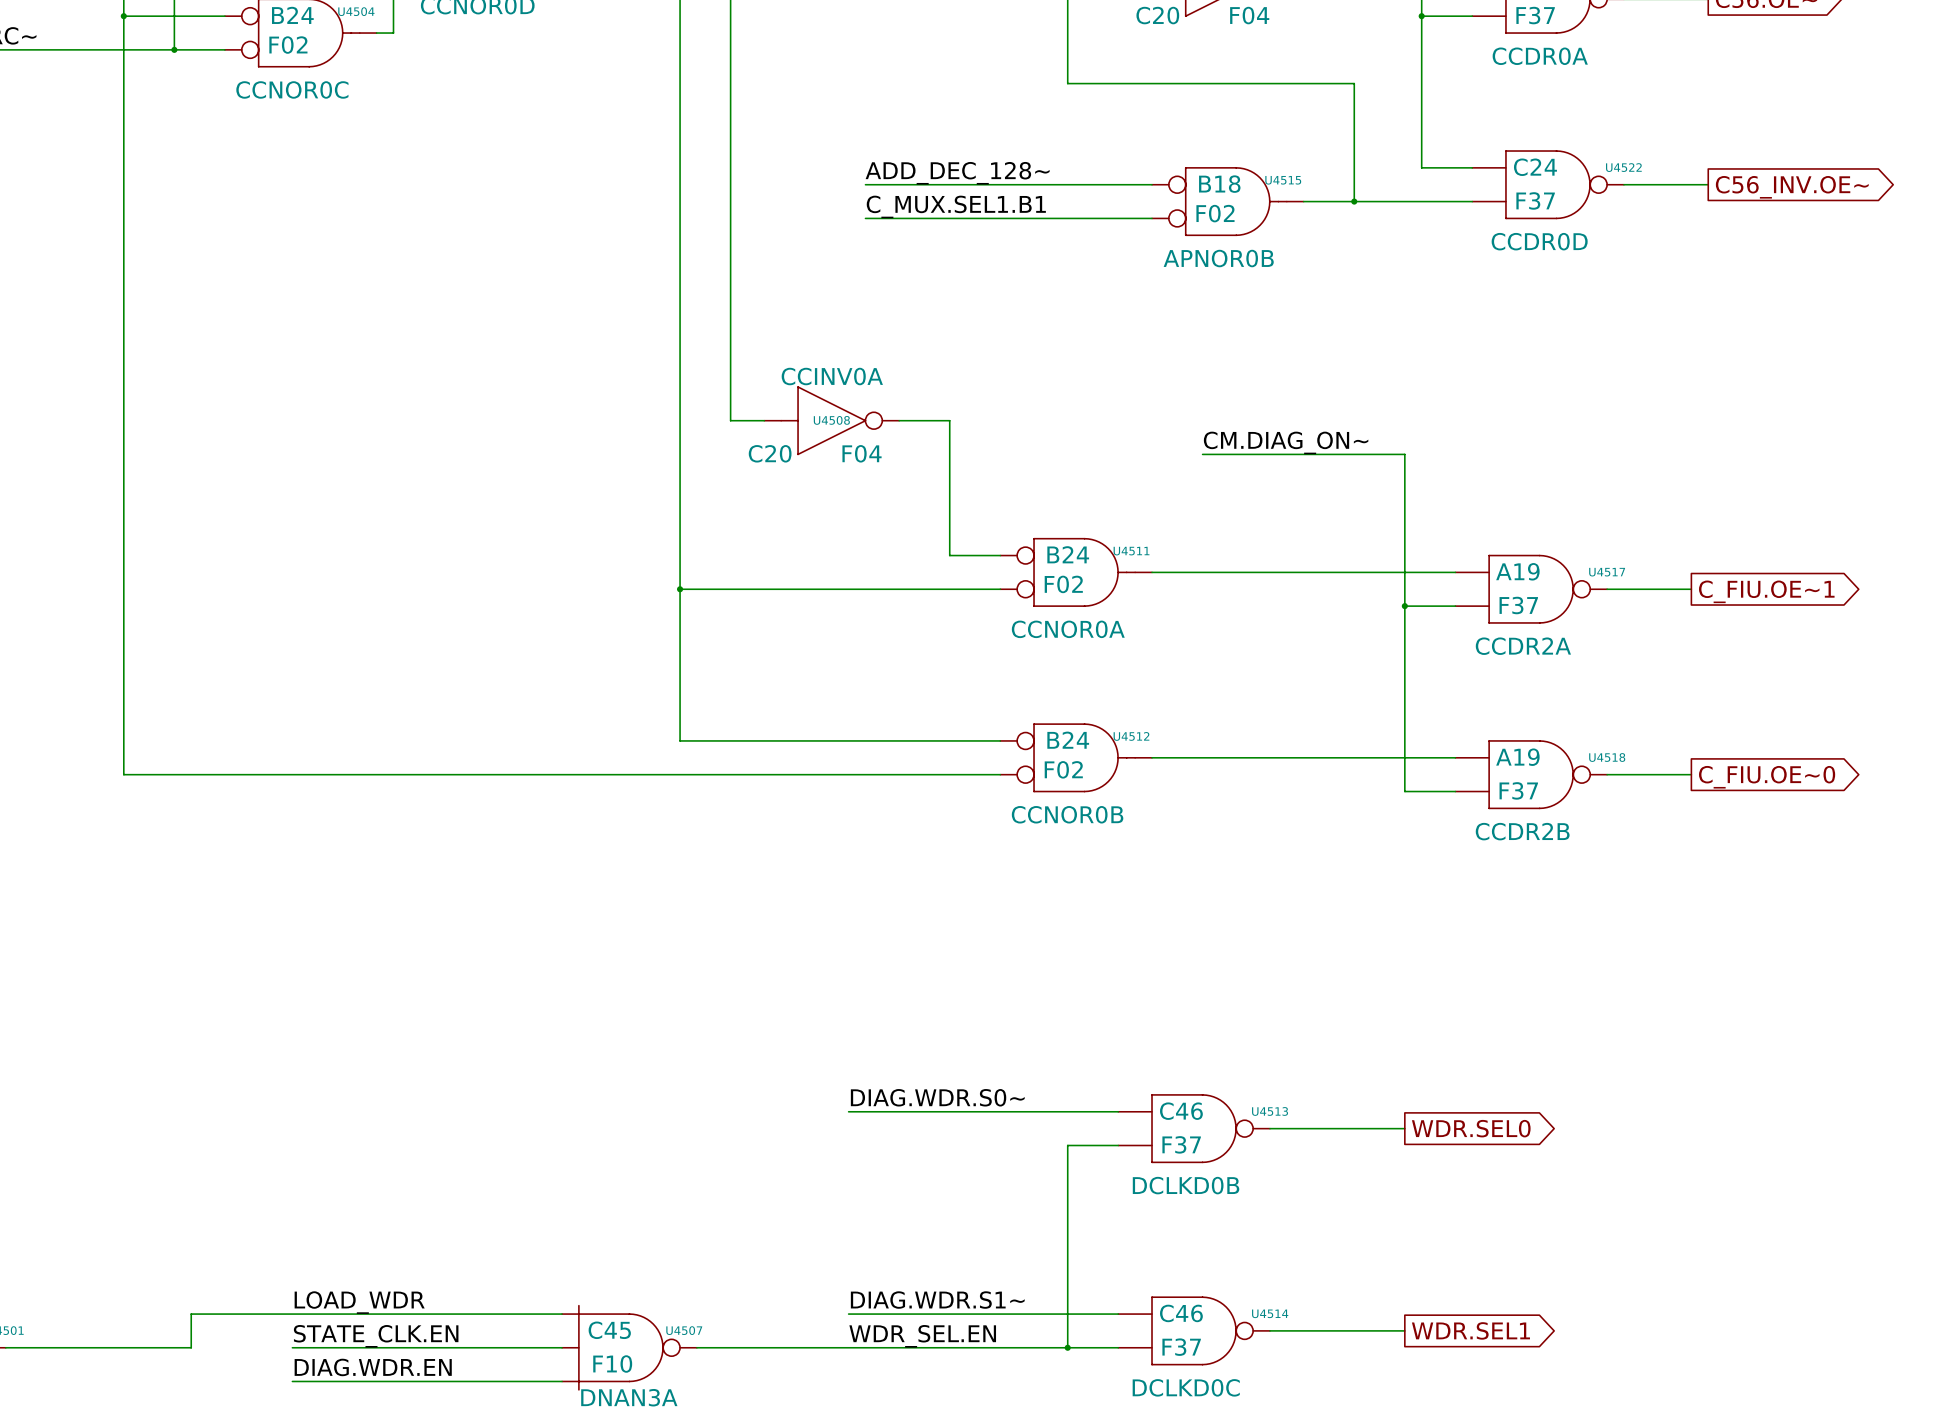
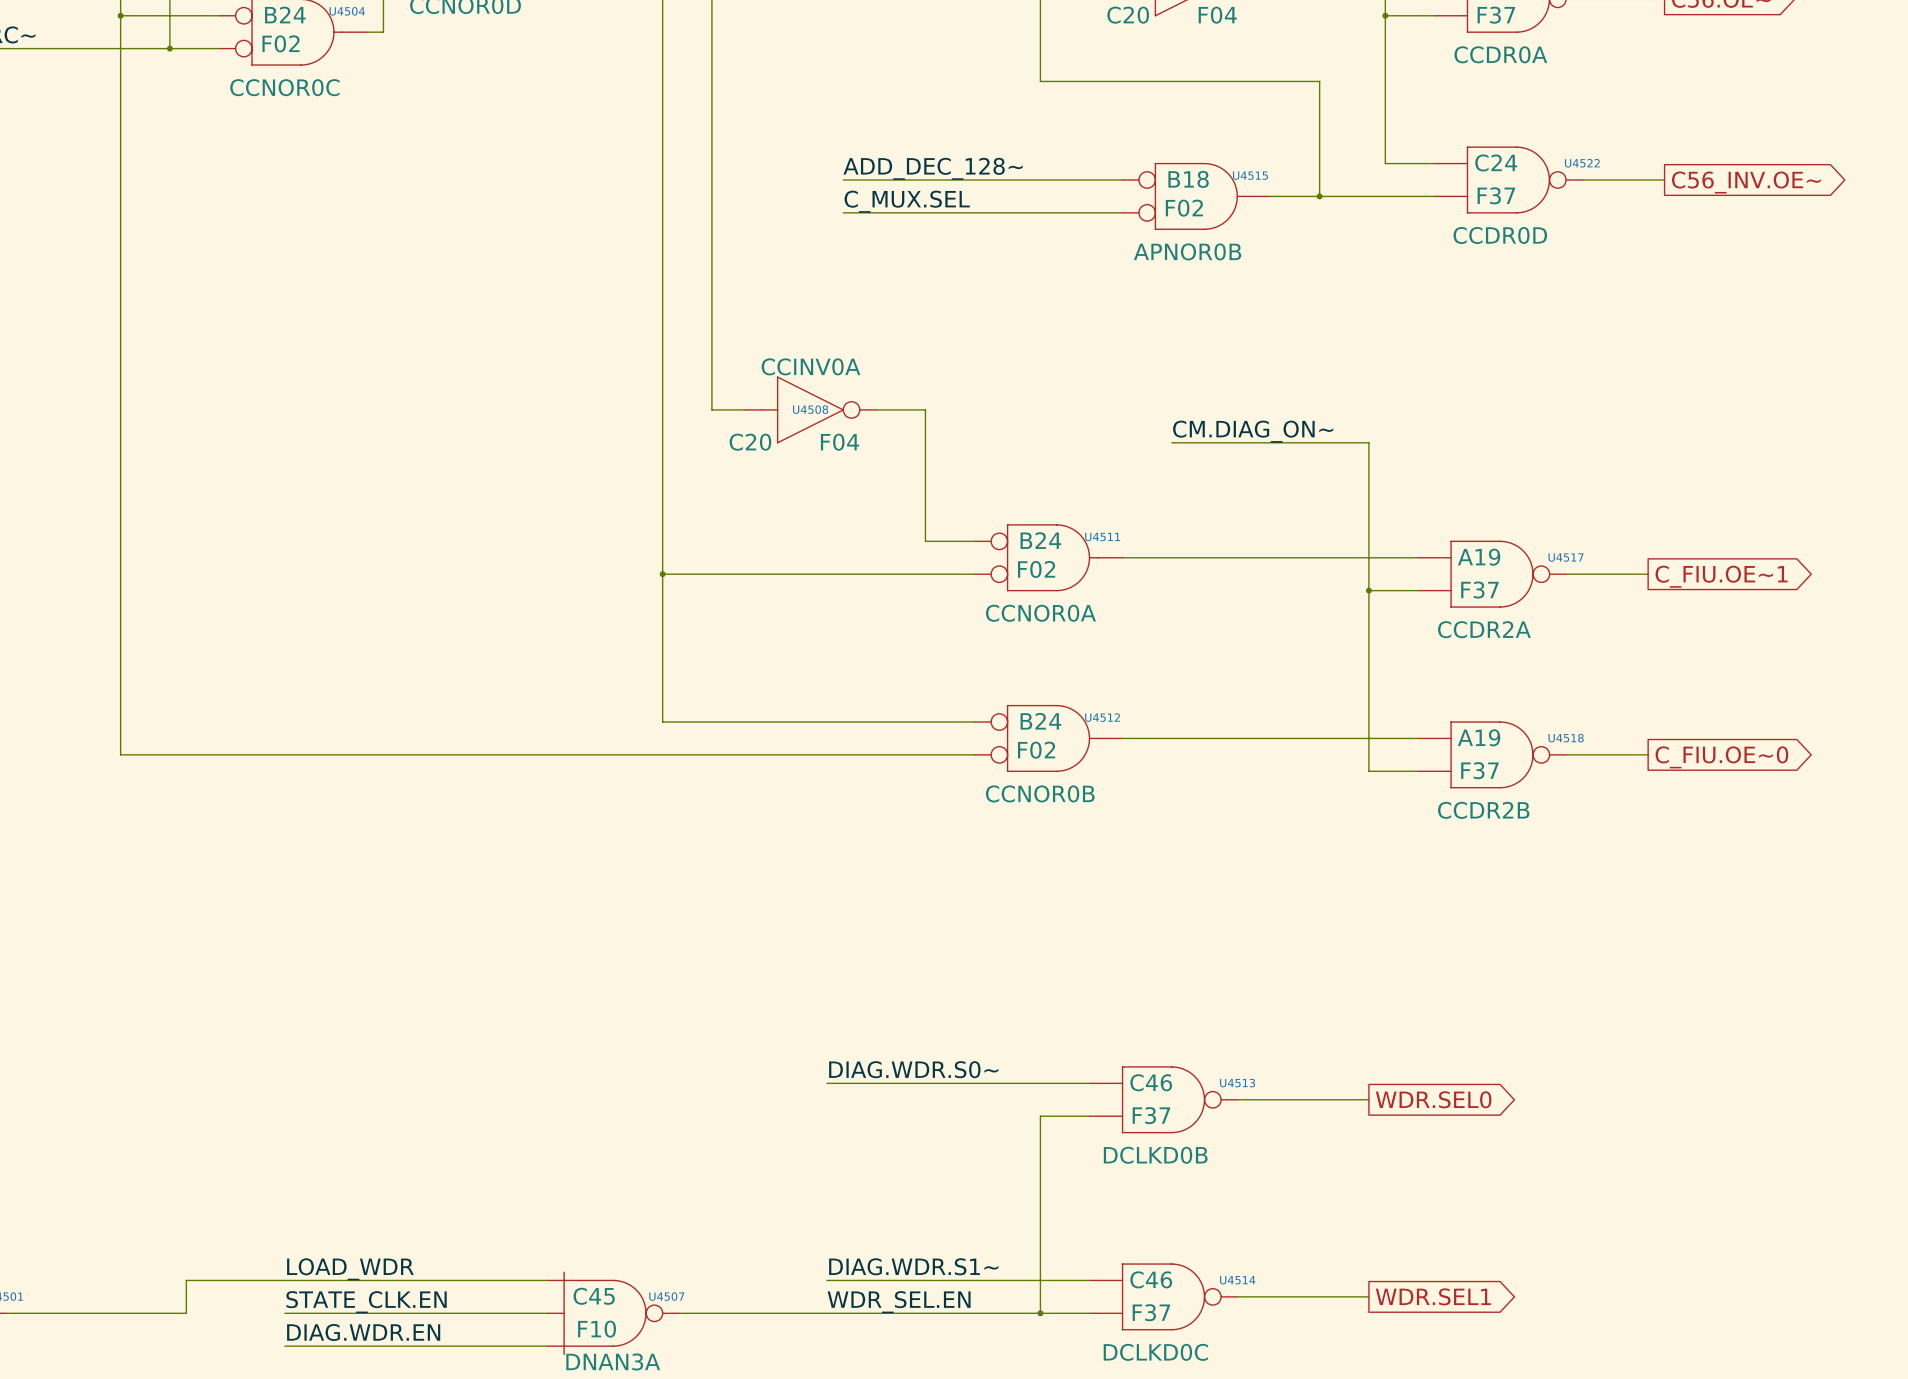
label: C_MUX.SEL1.B1 (956, 206) -> C_MUX.SEL (907, 201)

